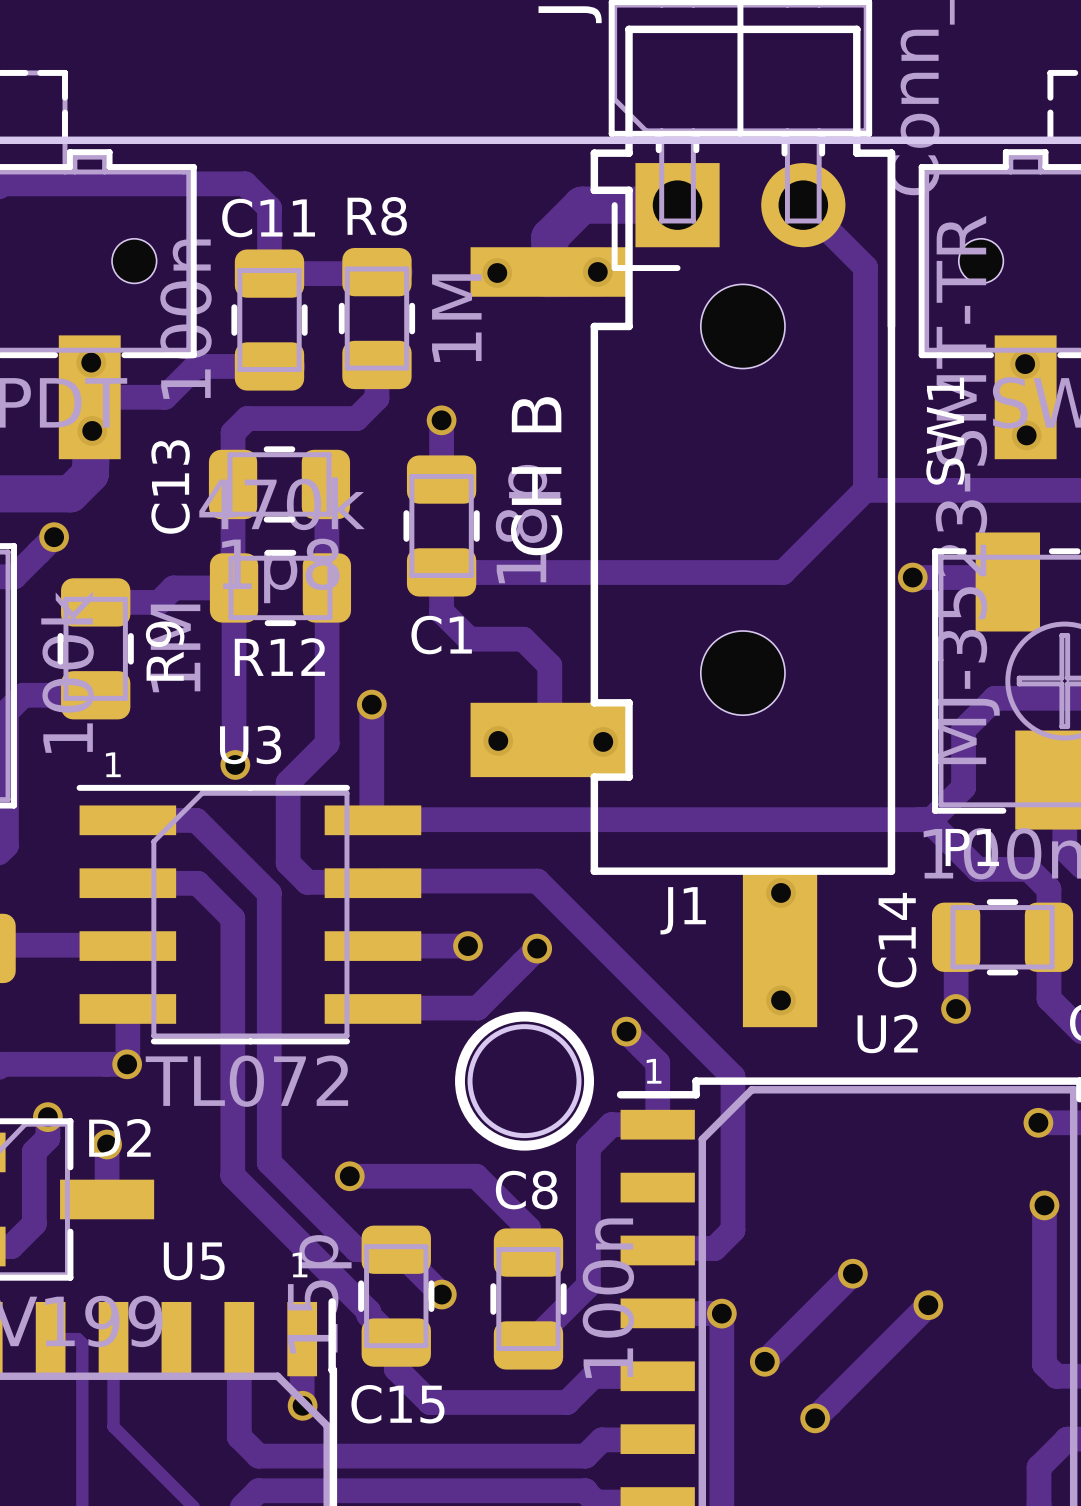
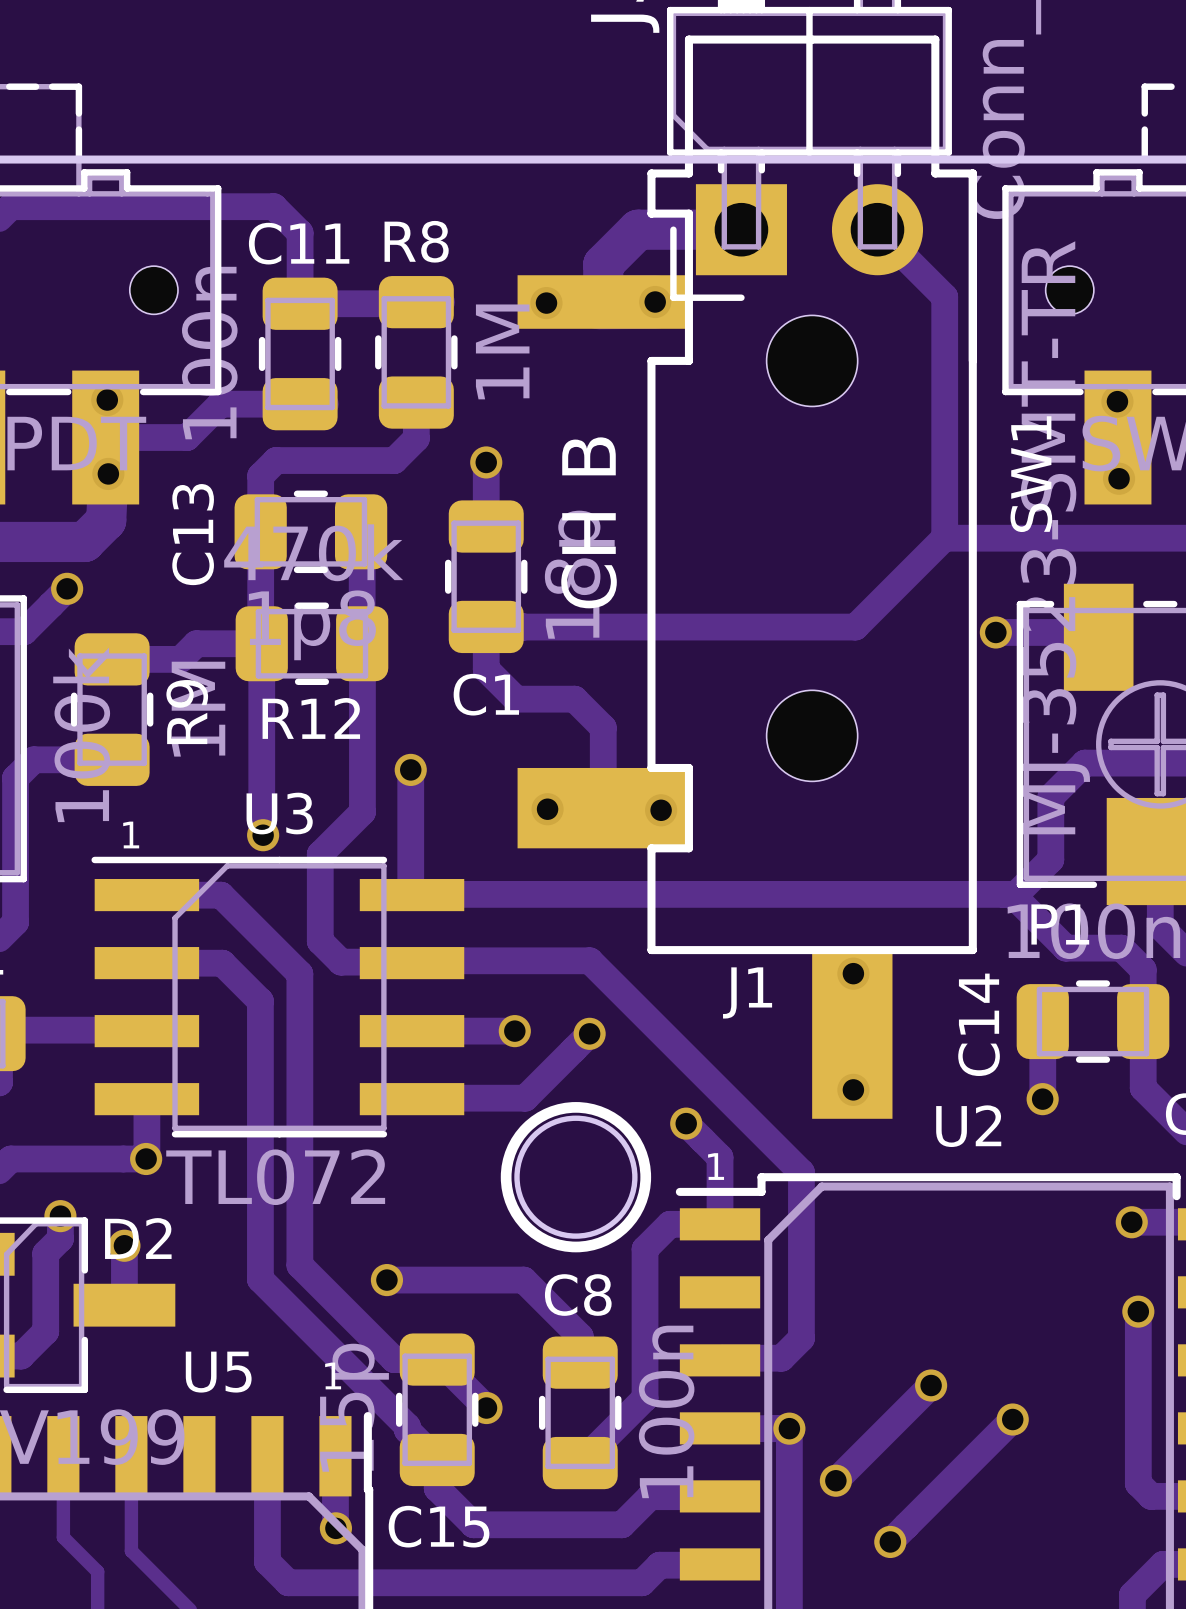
track: (50, 1339) (77, 1339) (82, 1343) (82, 1445) -> (63, 1456) (63, 1537) (97, 1571)

